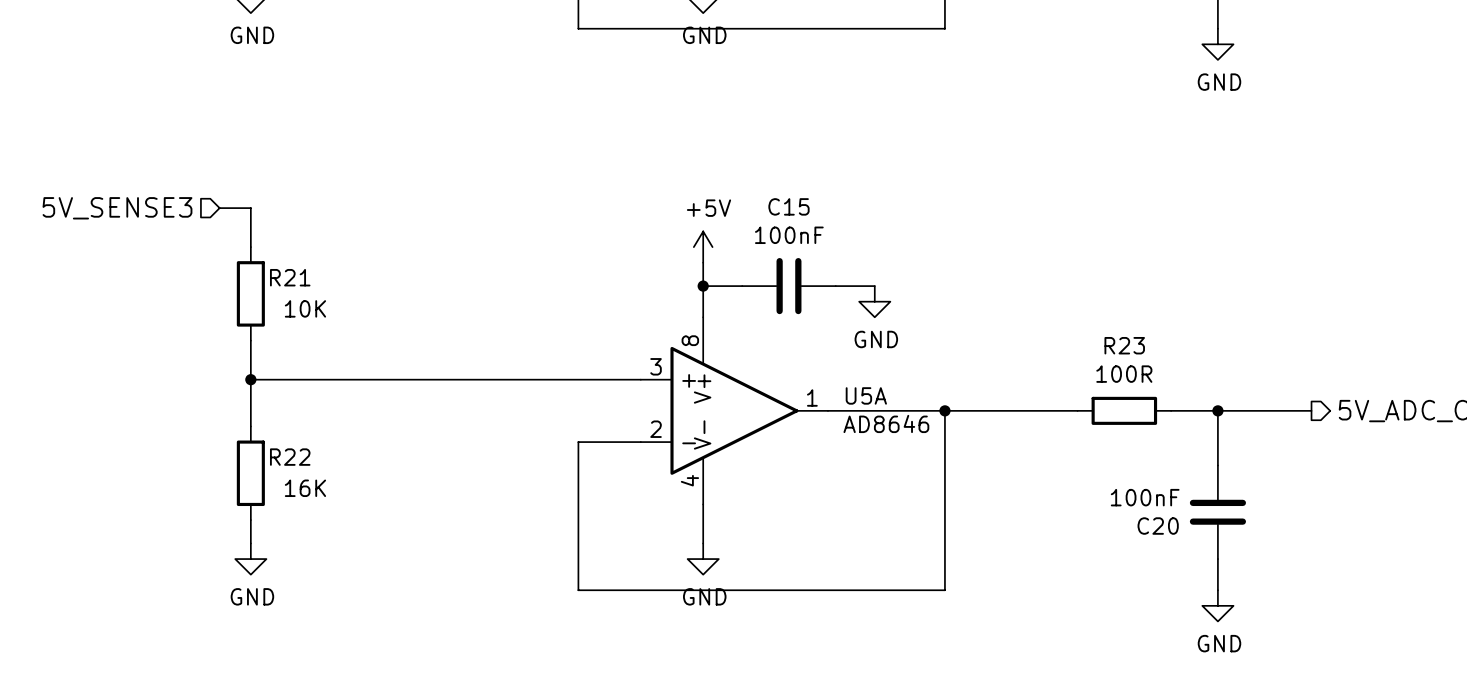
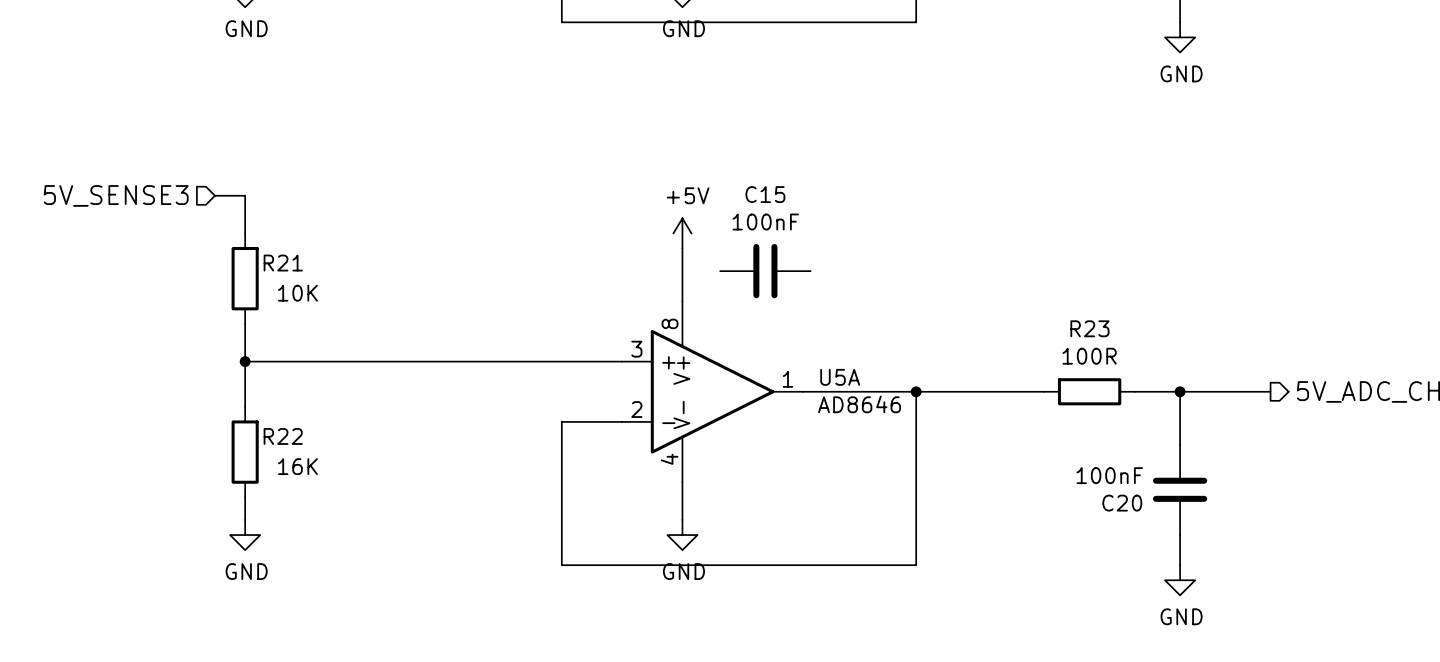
wire: (703, 286) (742, 286) -> none
junction: (703, 286) -> none
wire: (835, 286) (874, 286) -> none
power symbol: GND (874, 301) -> none

